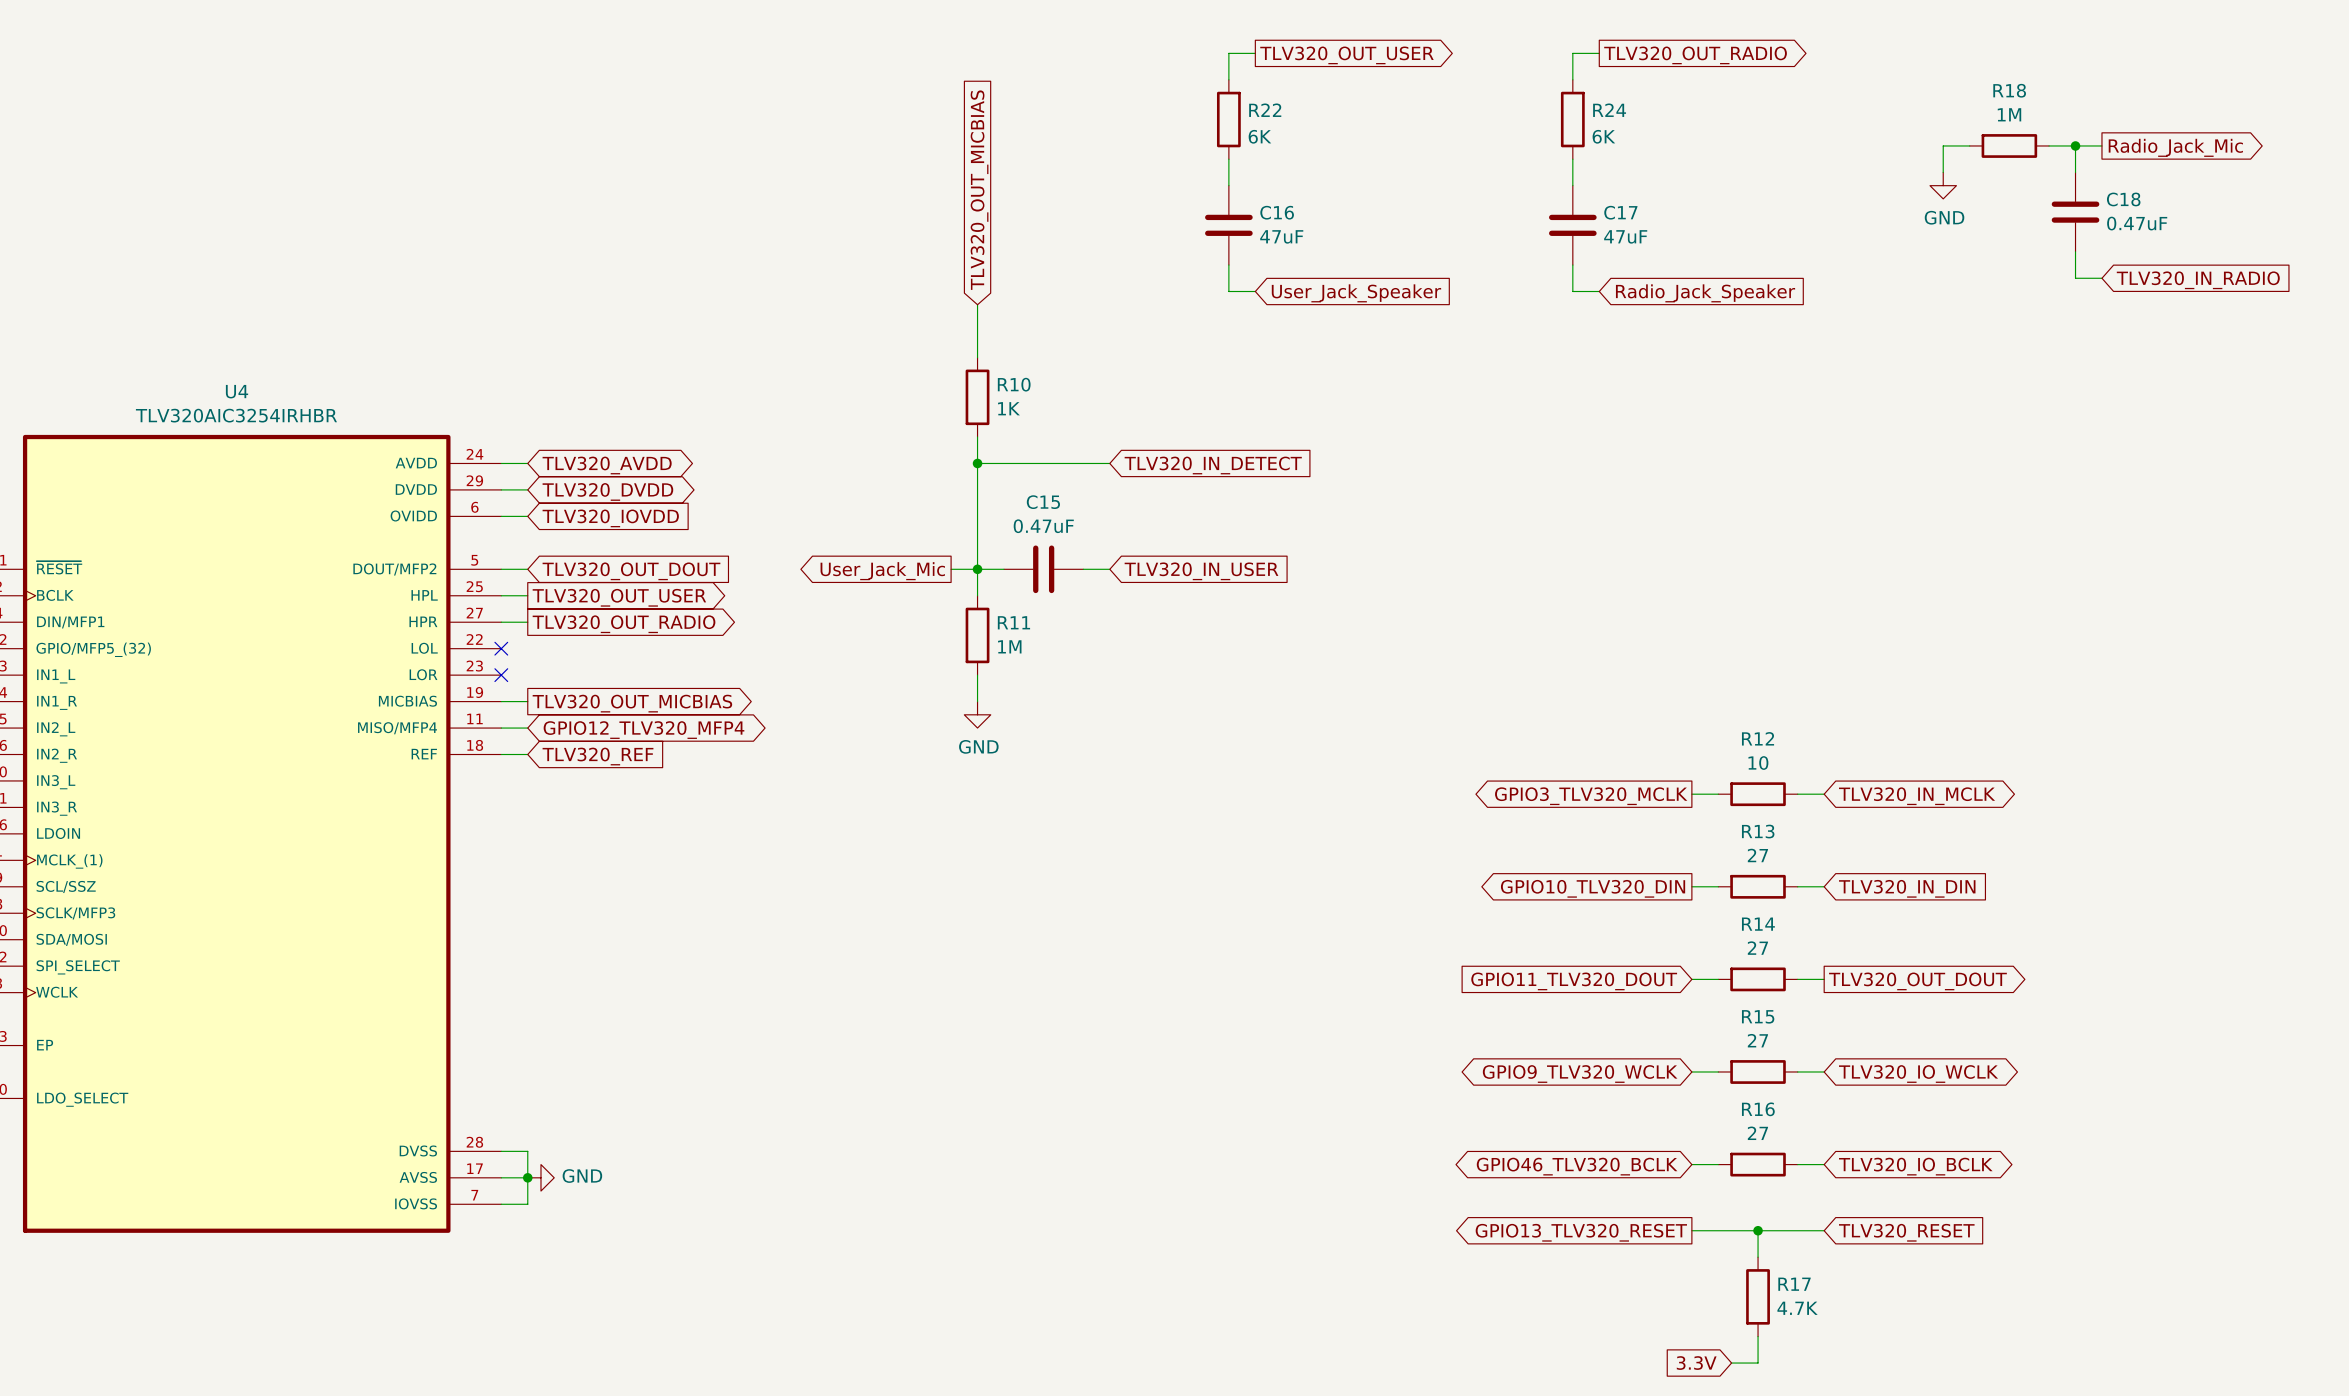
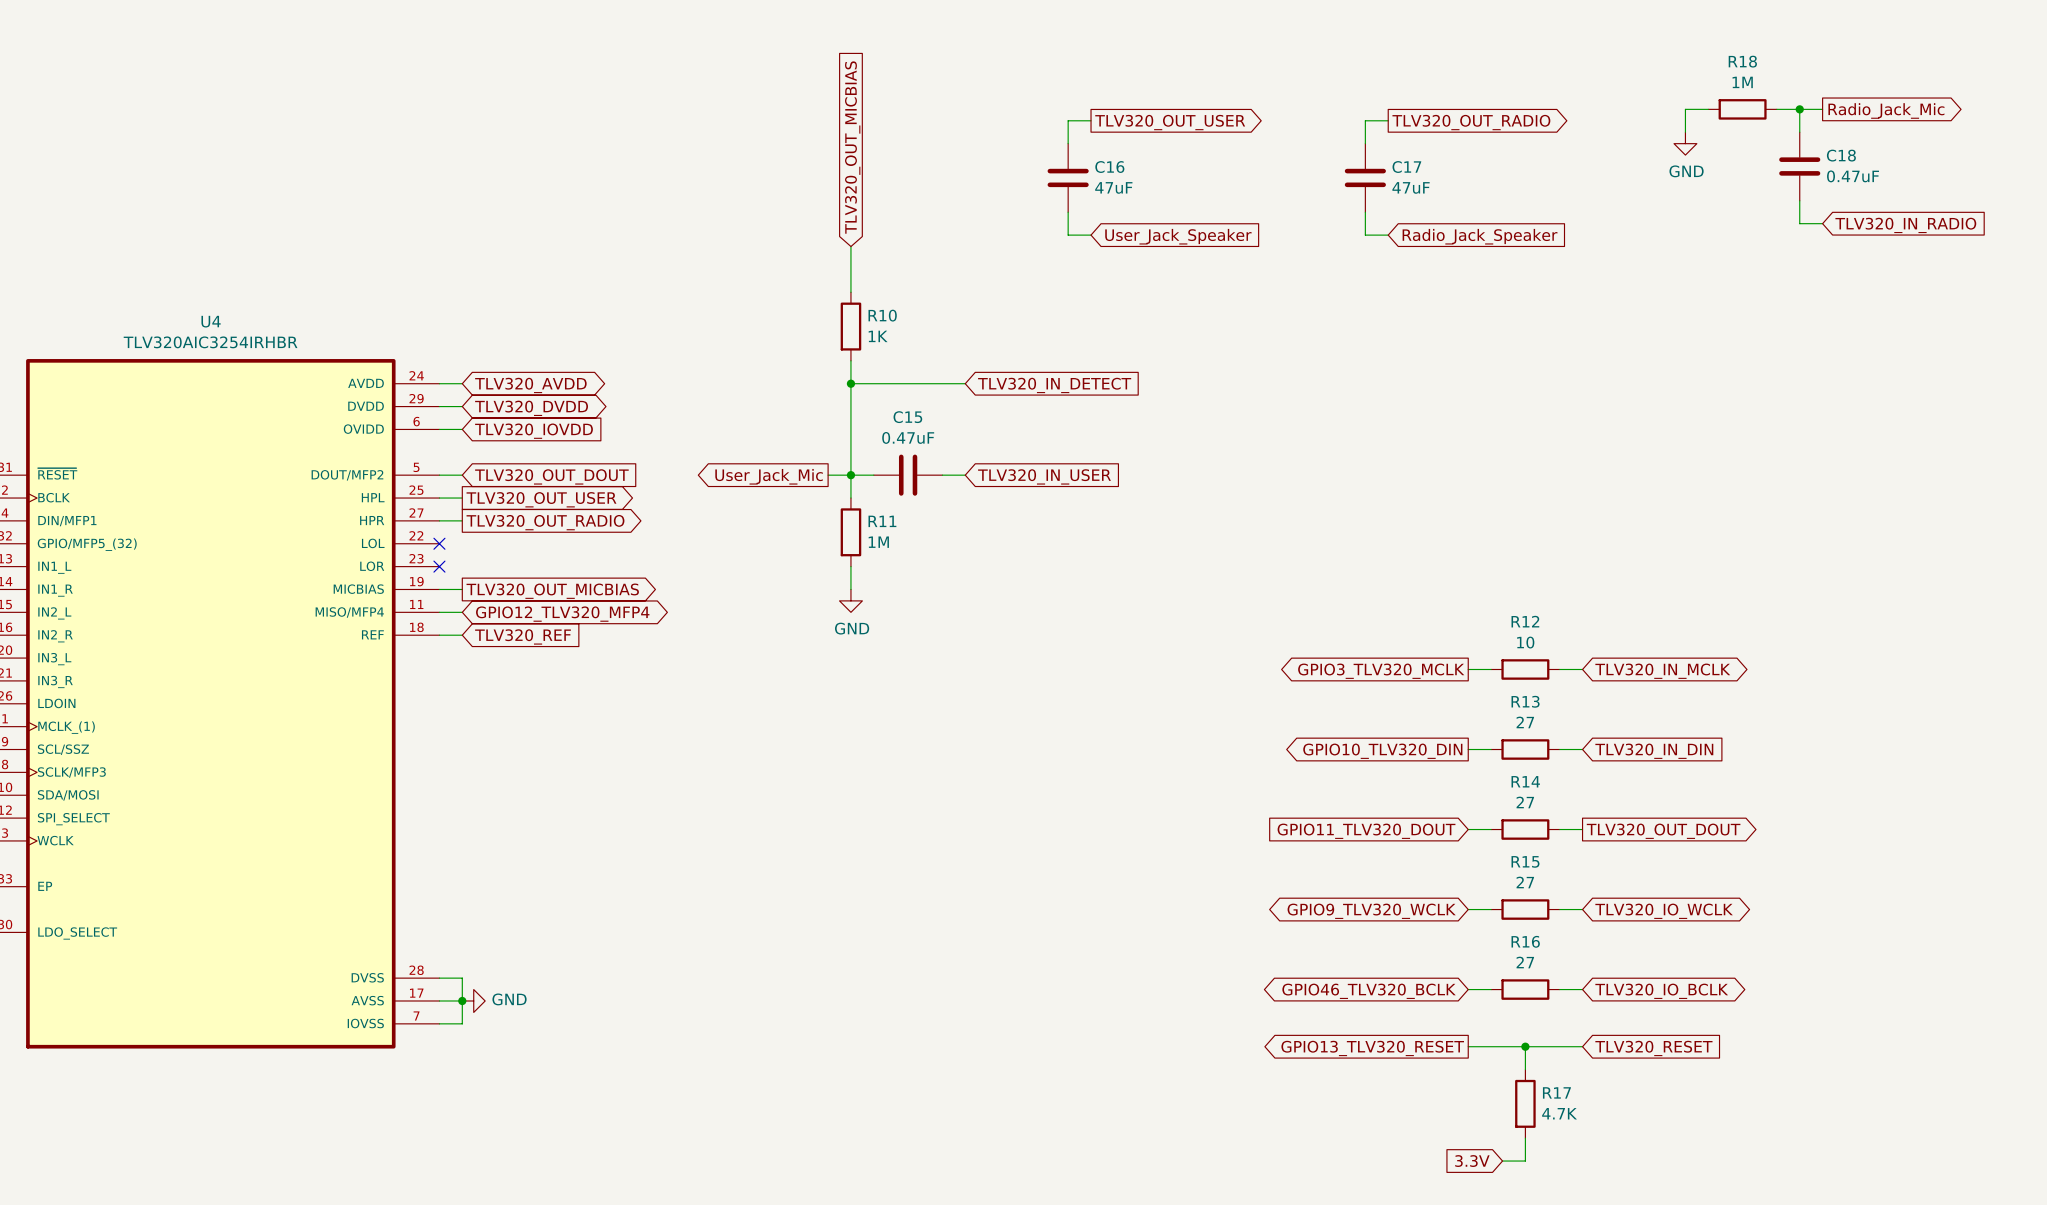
wire: (1255, 53) (1228, 53) (1228, 79) -> none
wire: (1599, 53) (1572, 53) (1572, 79) -> none
global label position: TLV320_OUT_USER (1346, 55) -> TLV320_OUT_USER (1170, 122)
global label position: TLV320_OUT_RADIO (1695, 55) -> TLV320_OUT_RADIO (1471, 122)
R22: 6K (1228, 119) -> none
R24: 6K (1572, 119) -> none
wire: none -> (1068, 120) (1091, 120)
wire: none -> (1365, 120) (1388, 120)

